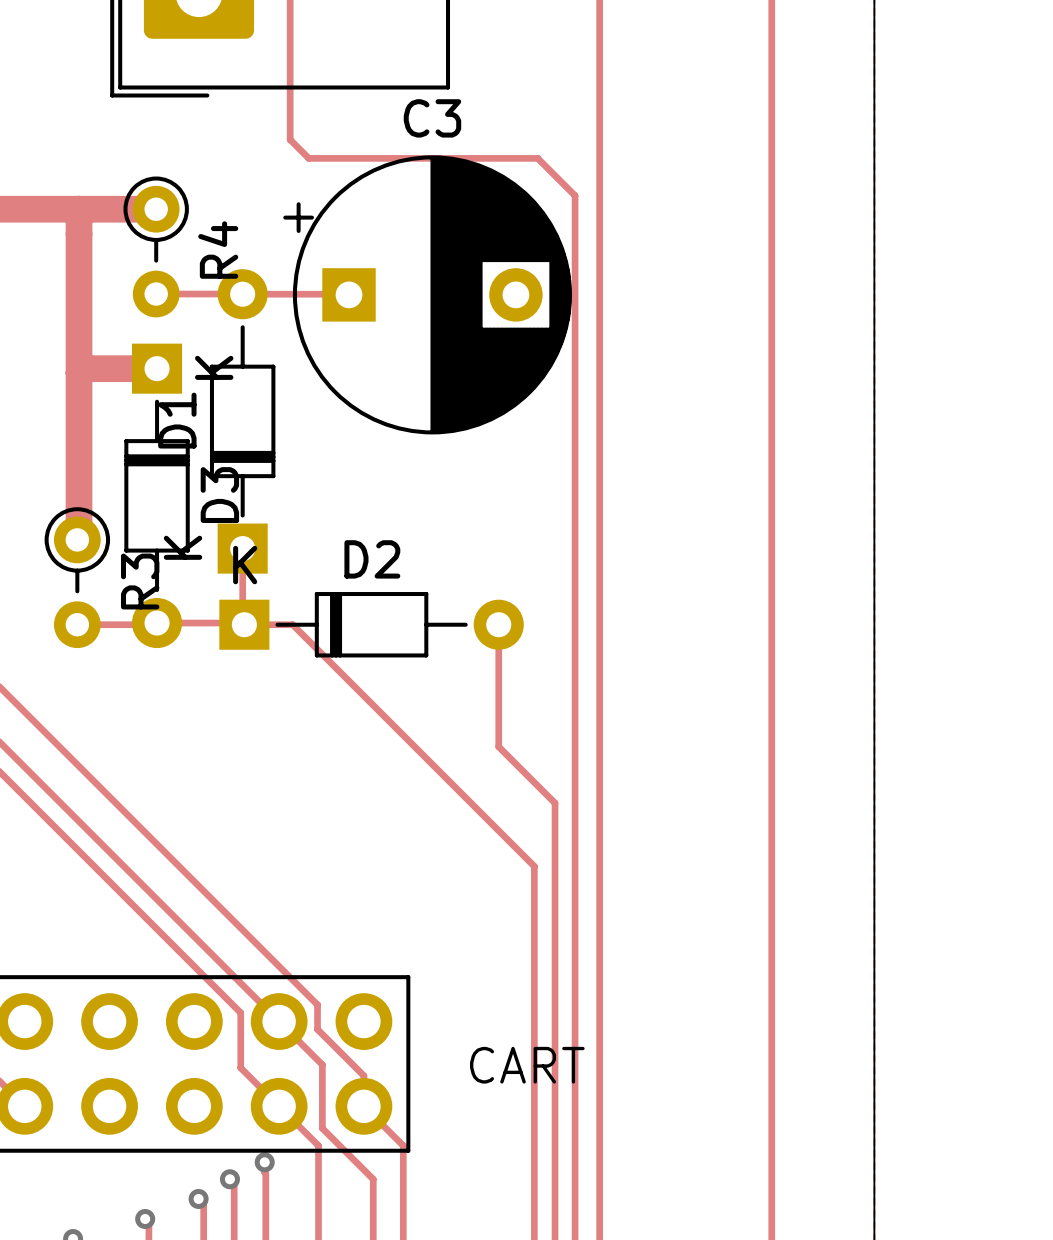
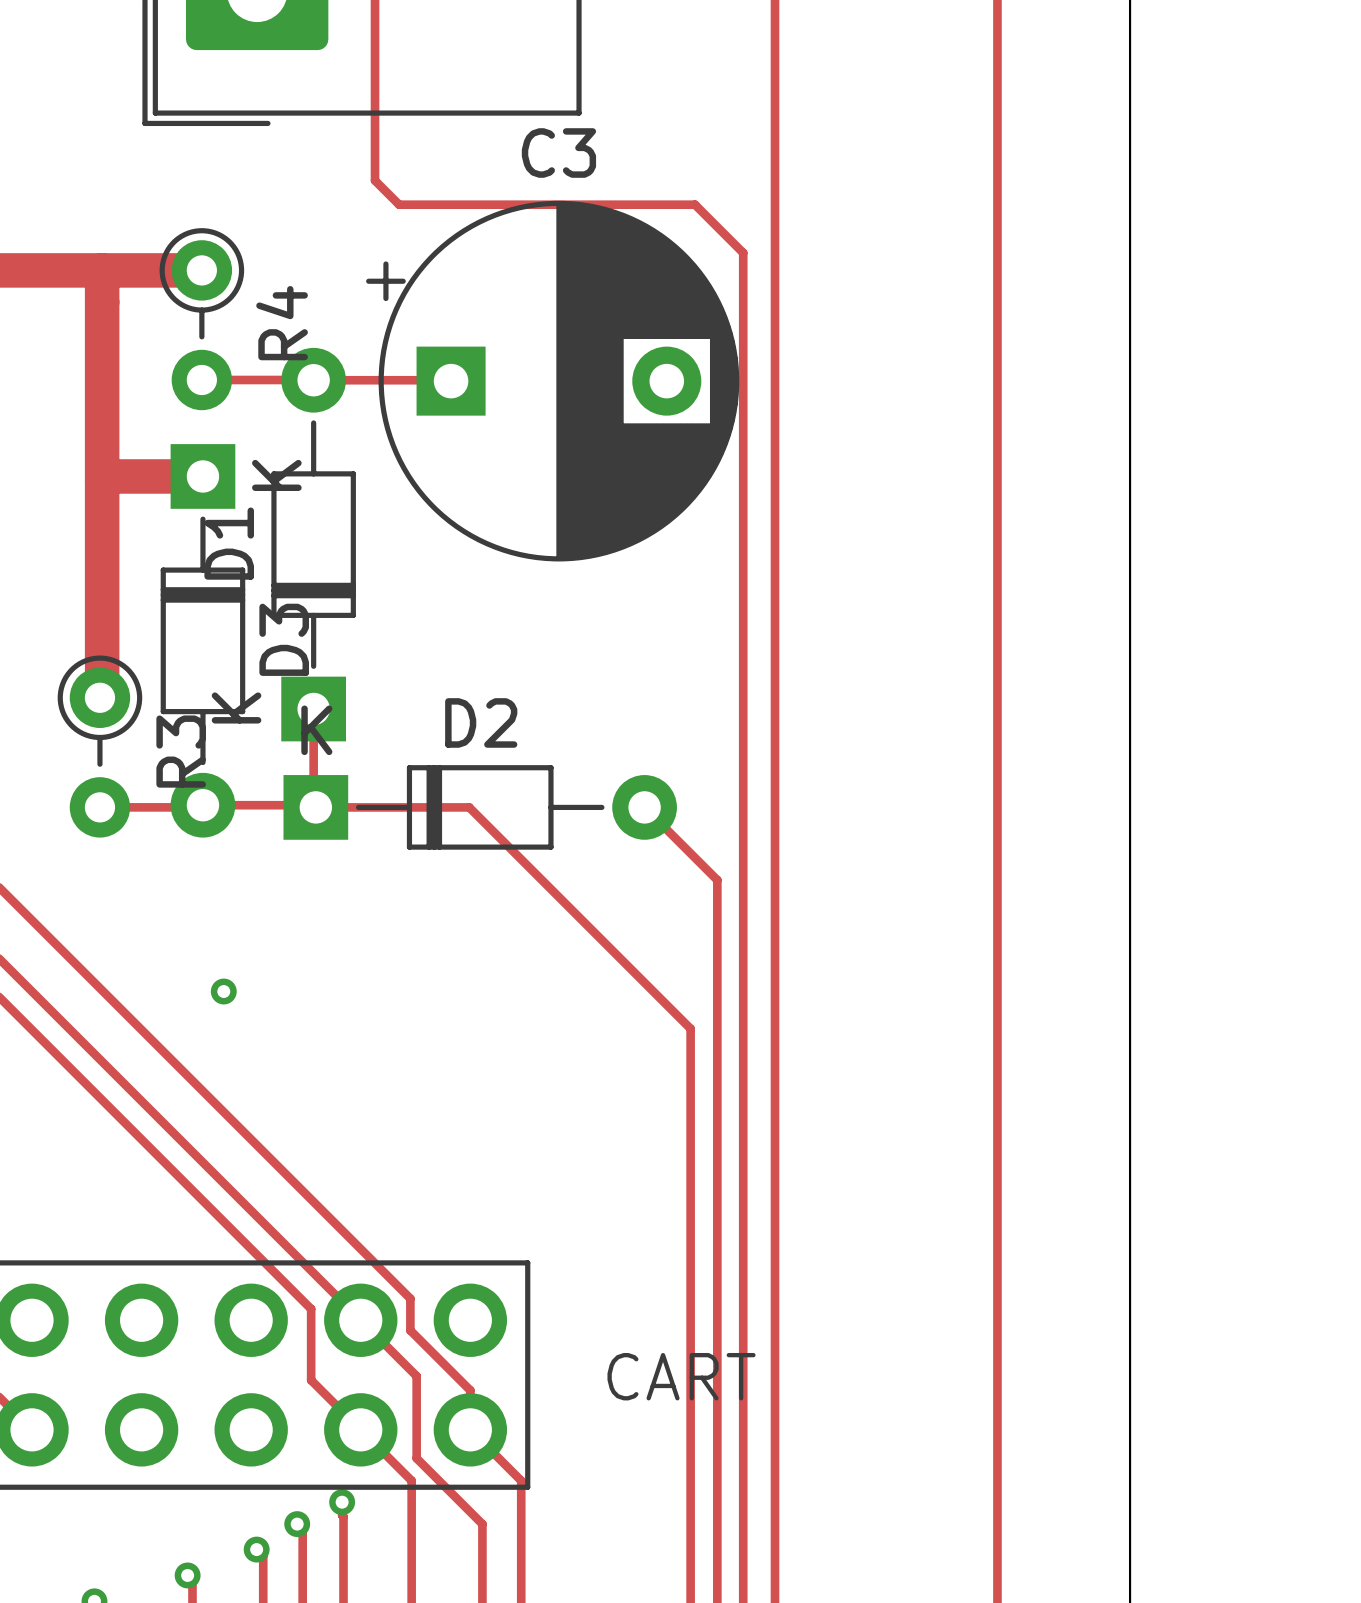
track: (292, 624) (534, 866) -> (378, 807) (469, 807) (690, 1028) (690, 1119)
track: (498, 624) (498, 746) (555, 803) -> (644, 807) (717, 880) (717, 1037)
via: none -> (223, 991)

